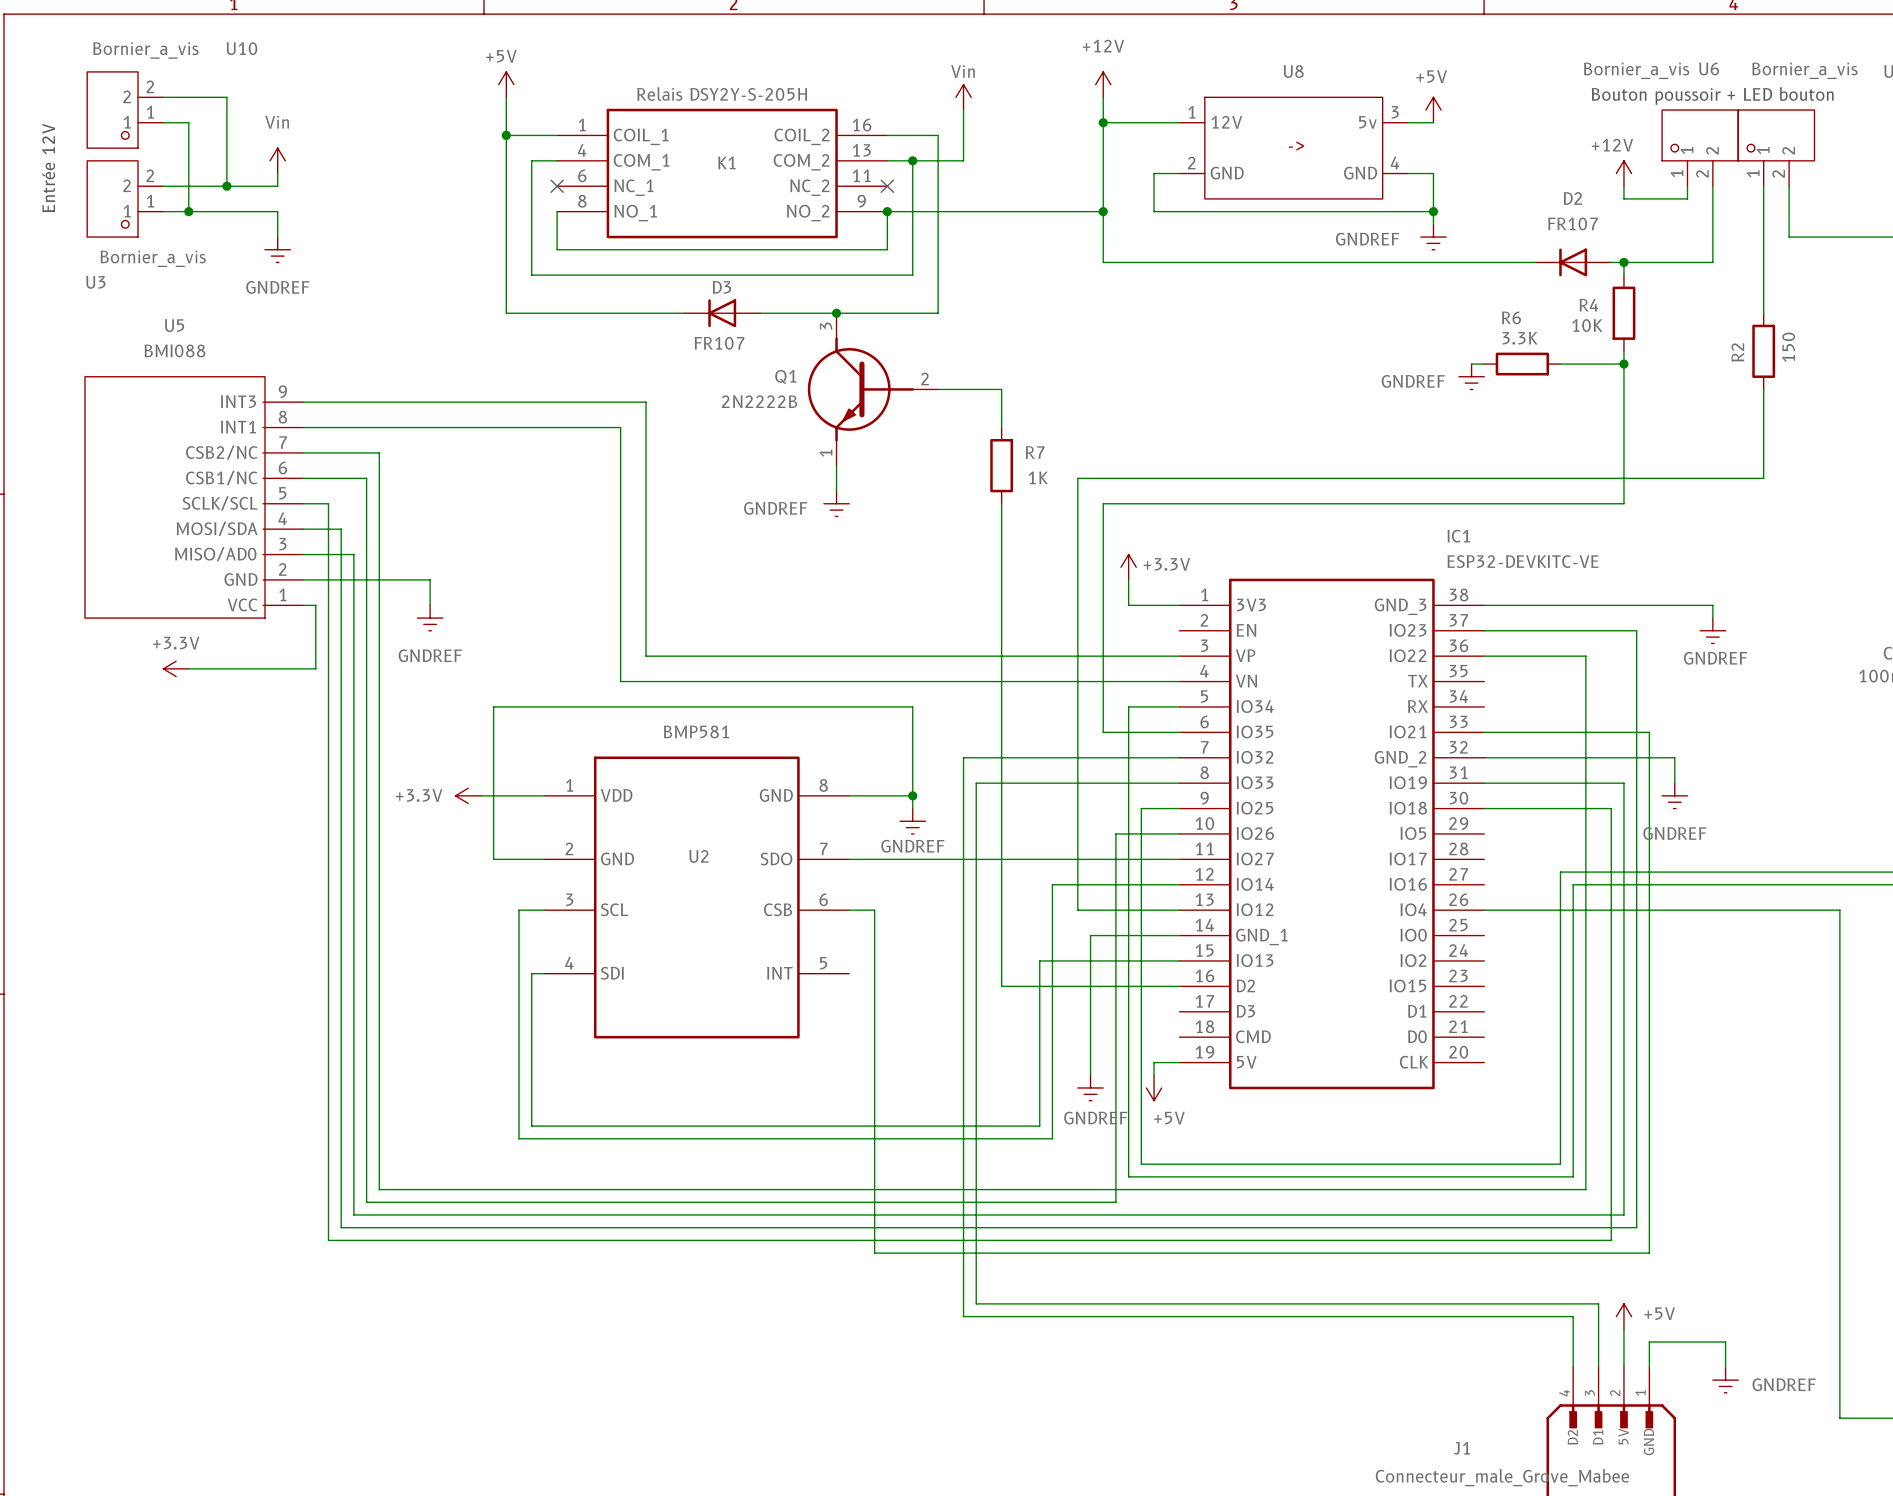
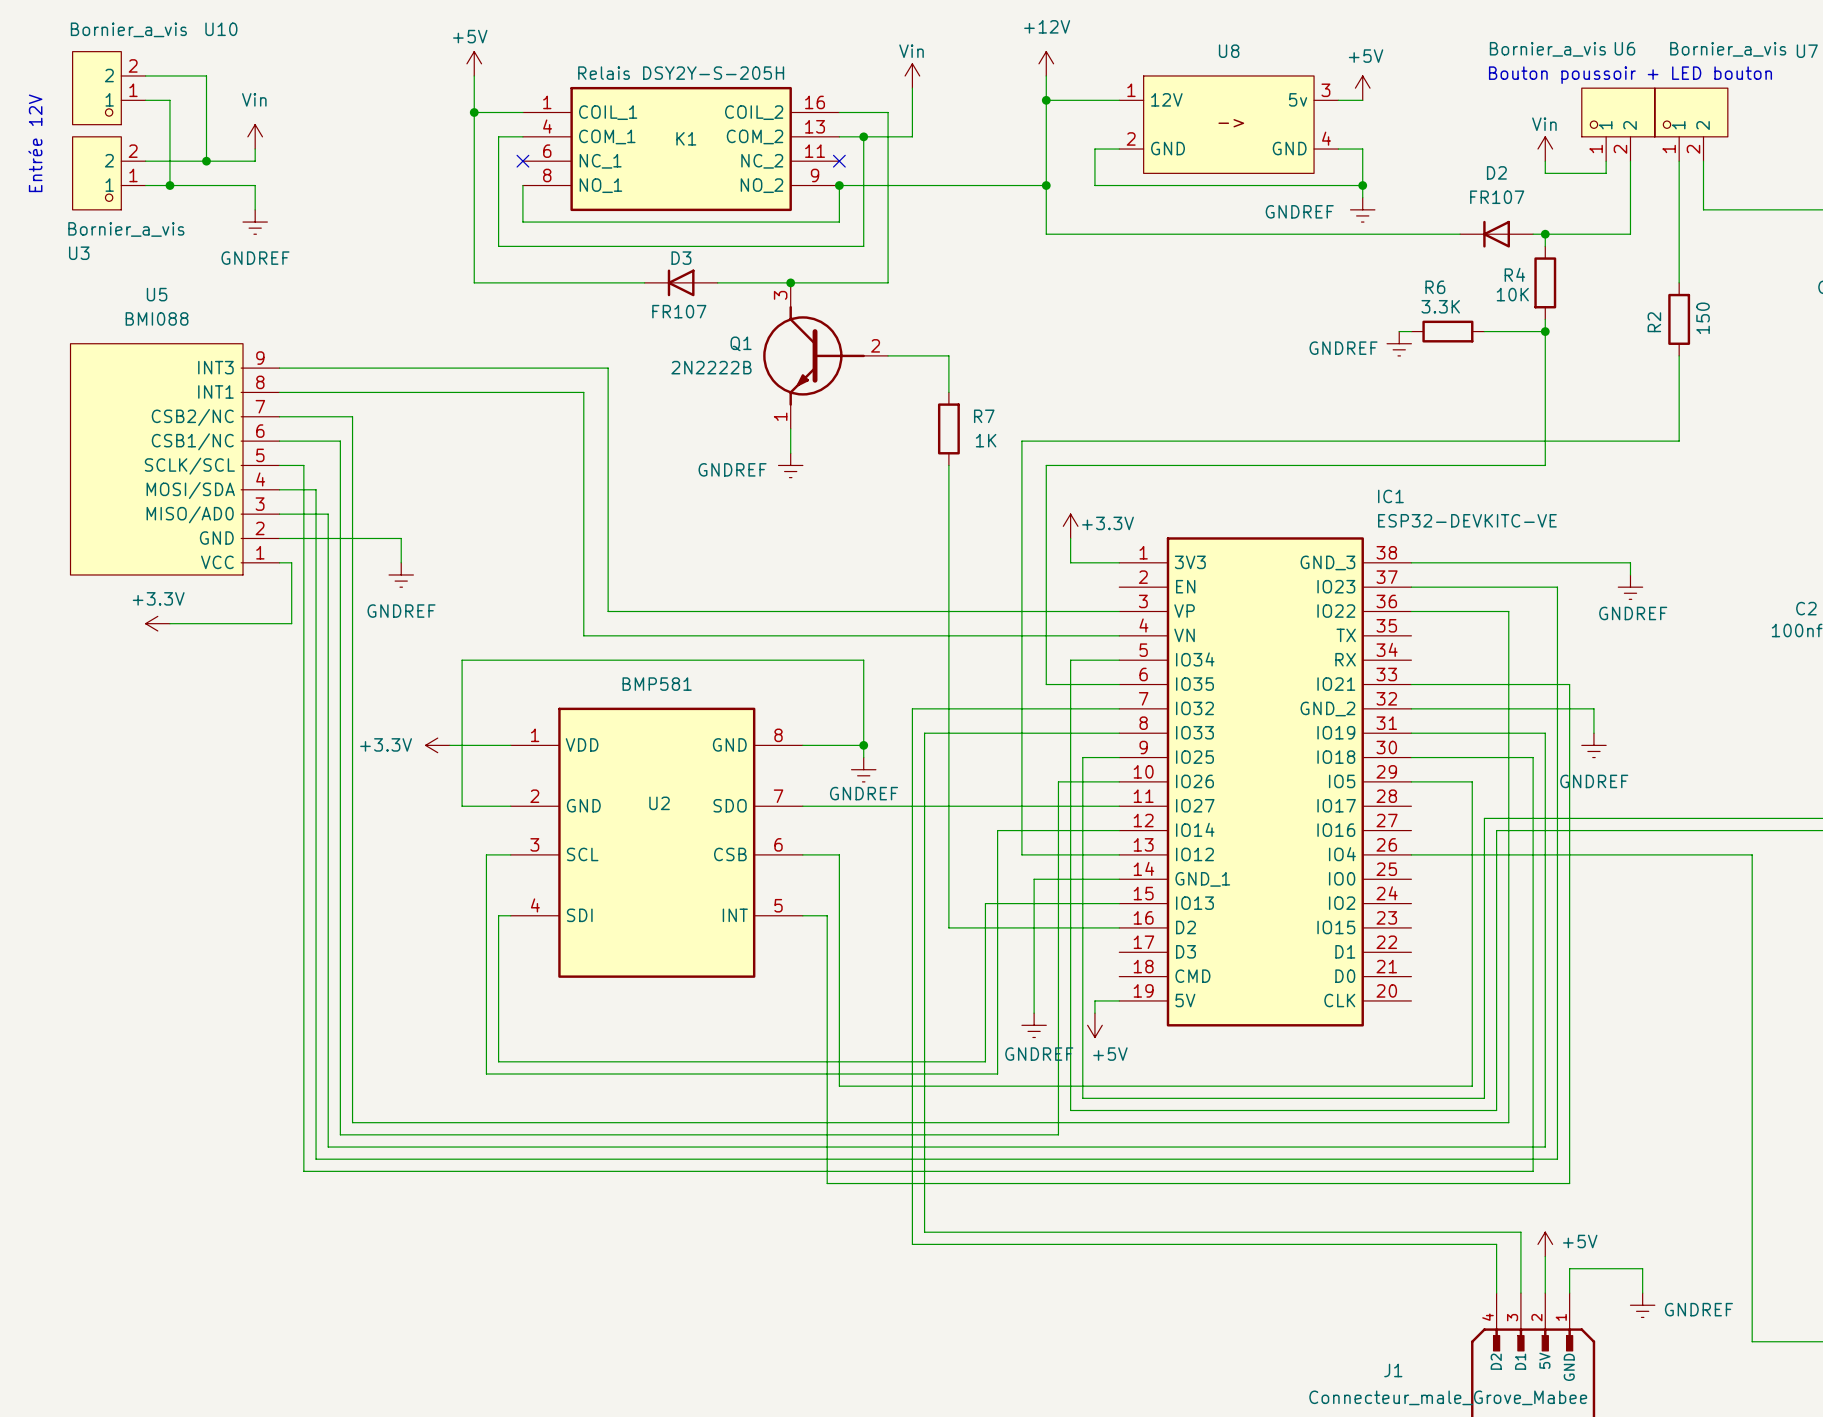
power symbol: +12V (1623, 173) -> Vin (1545, 149)
wire: none -> (1411, 781) (1472, 781) (1472, 1086) (839, 1086) (839, 854) (827, 854)
wire: (874, 910) (874, 973) -> (802, 915) (827, 915)

